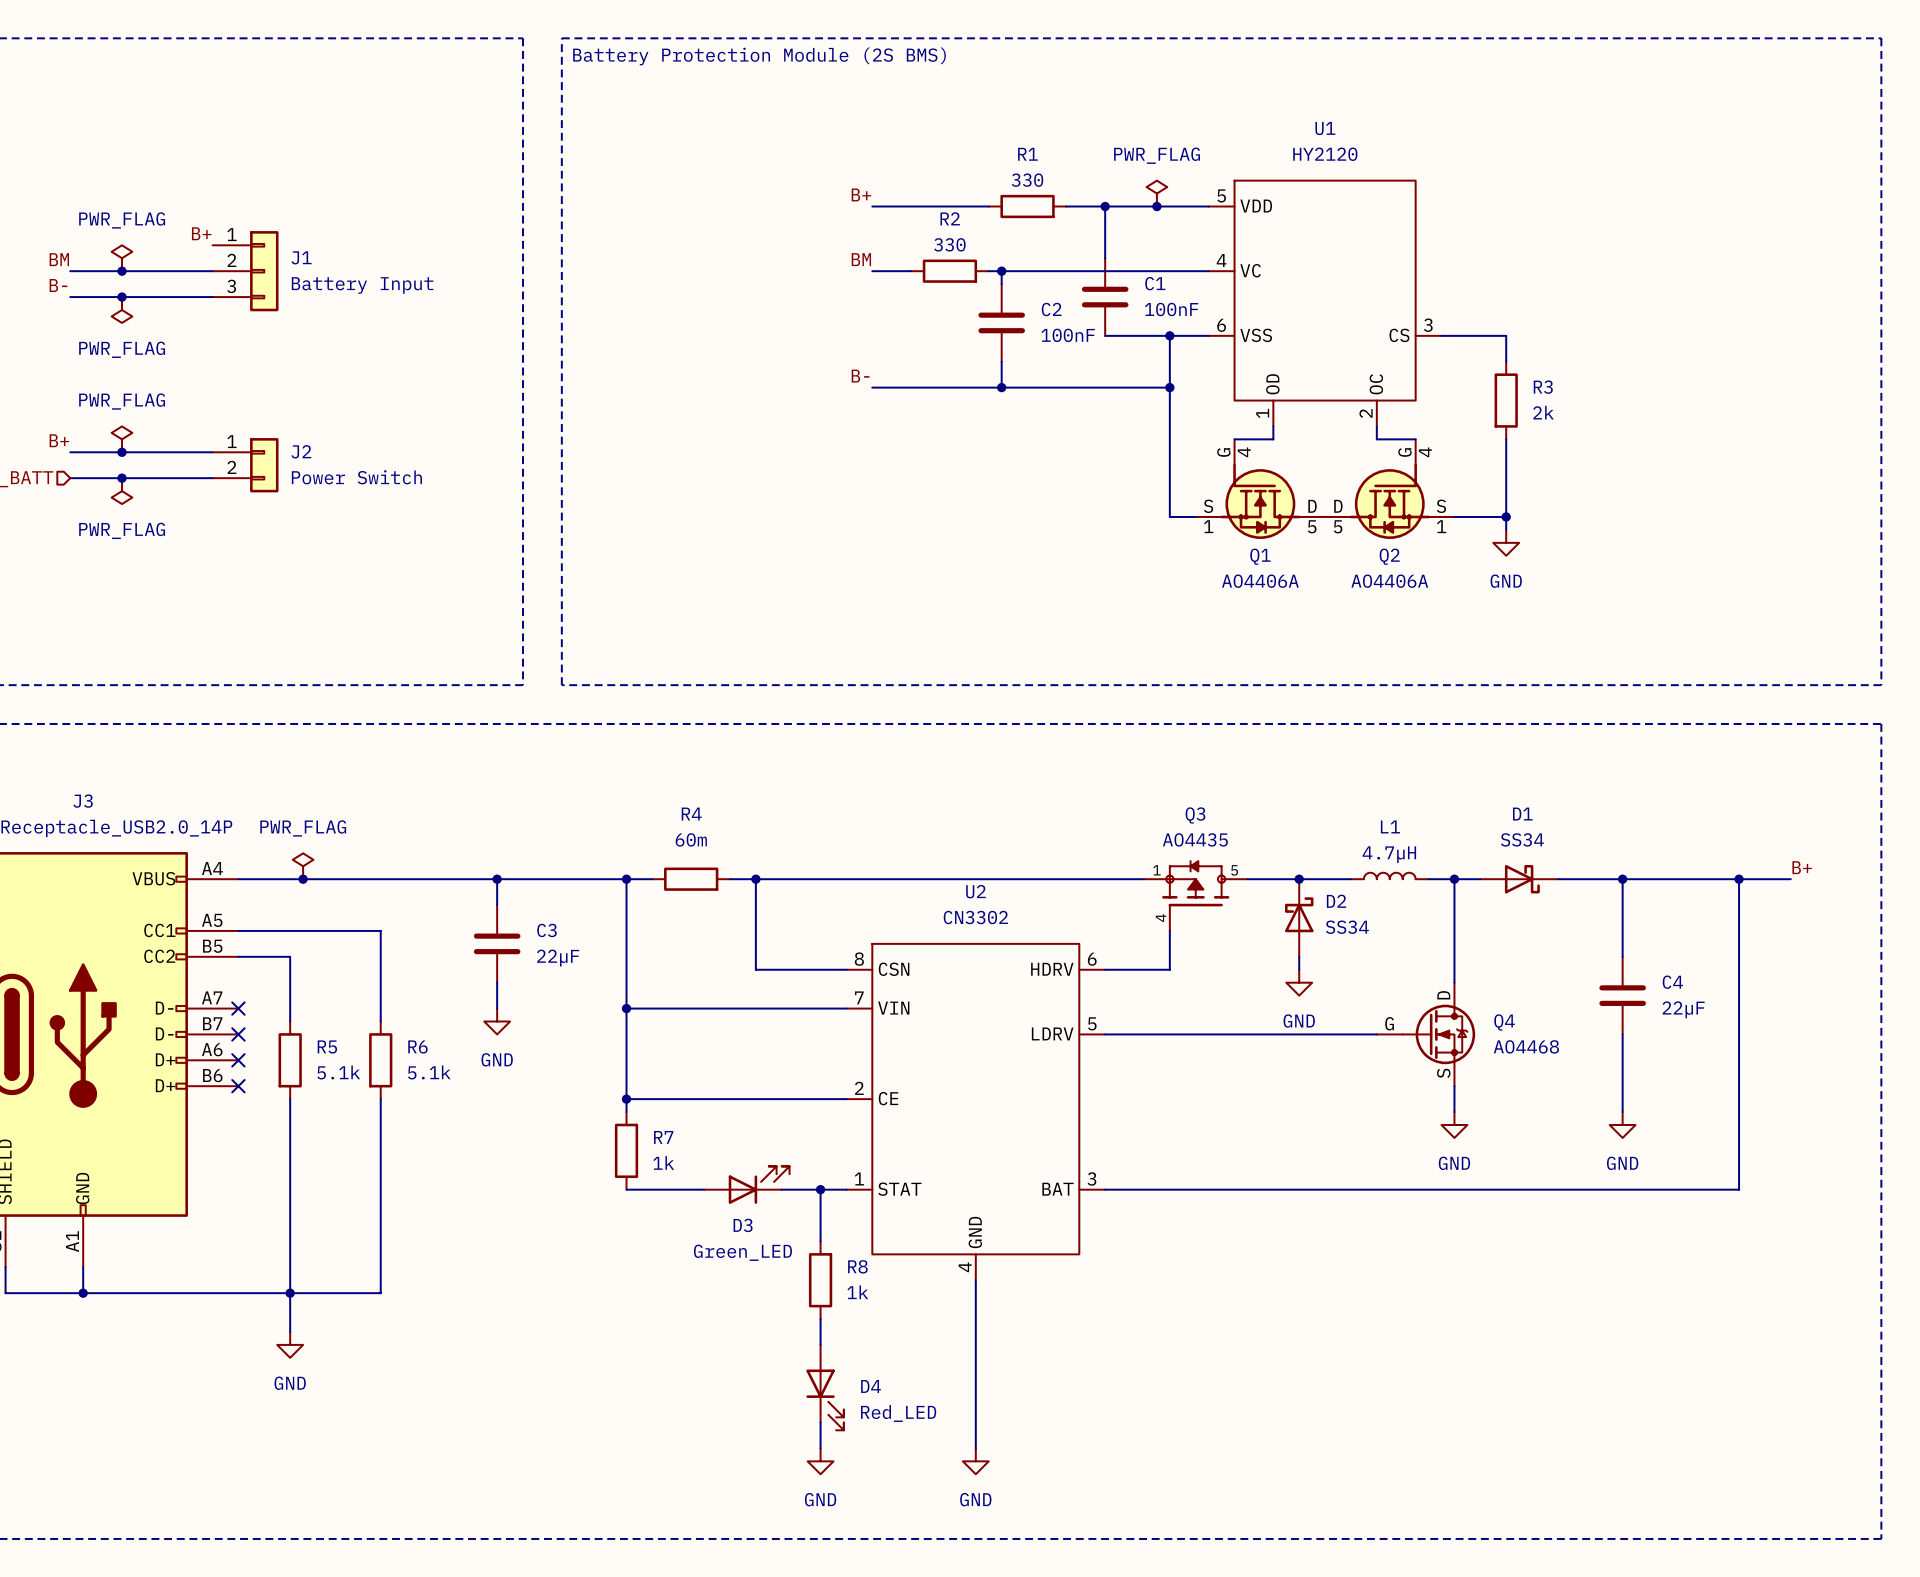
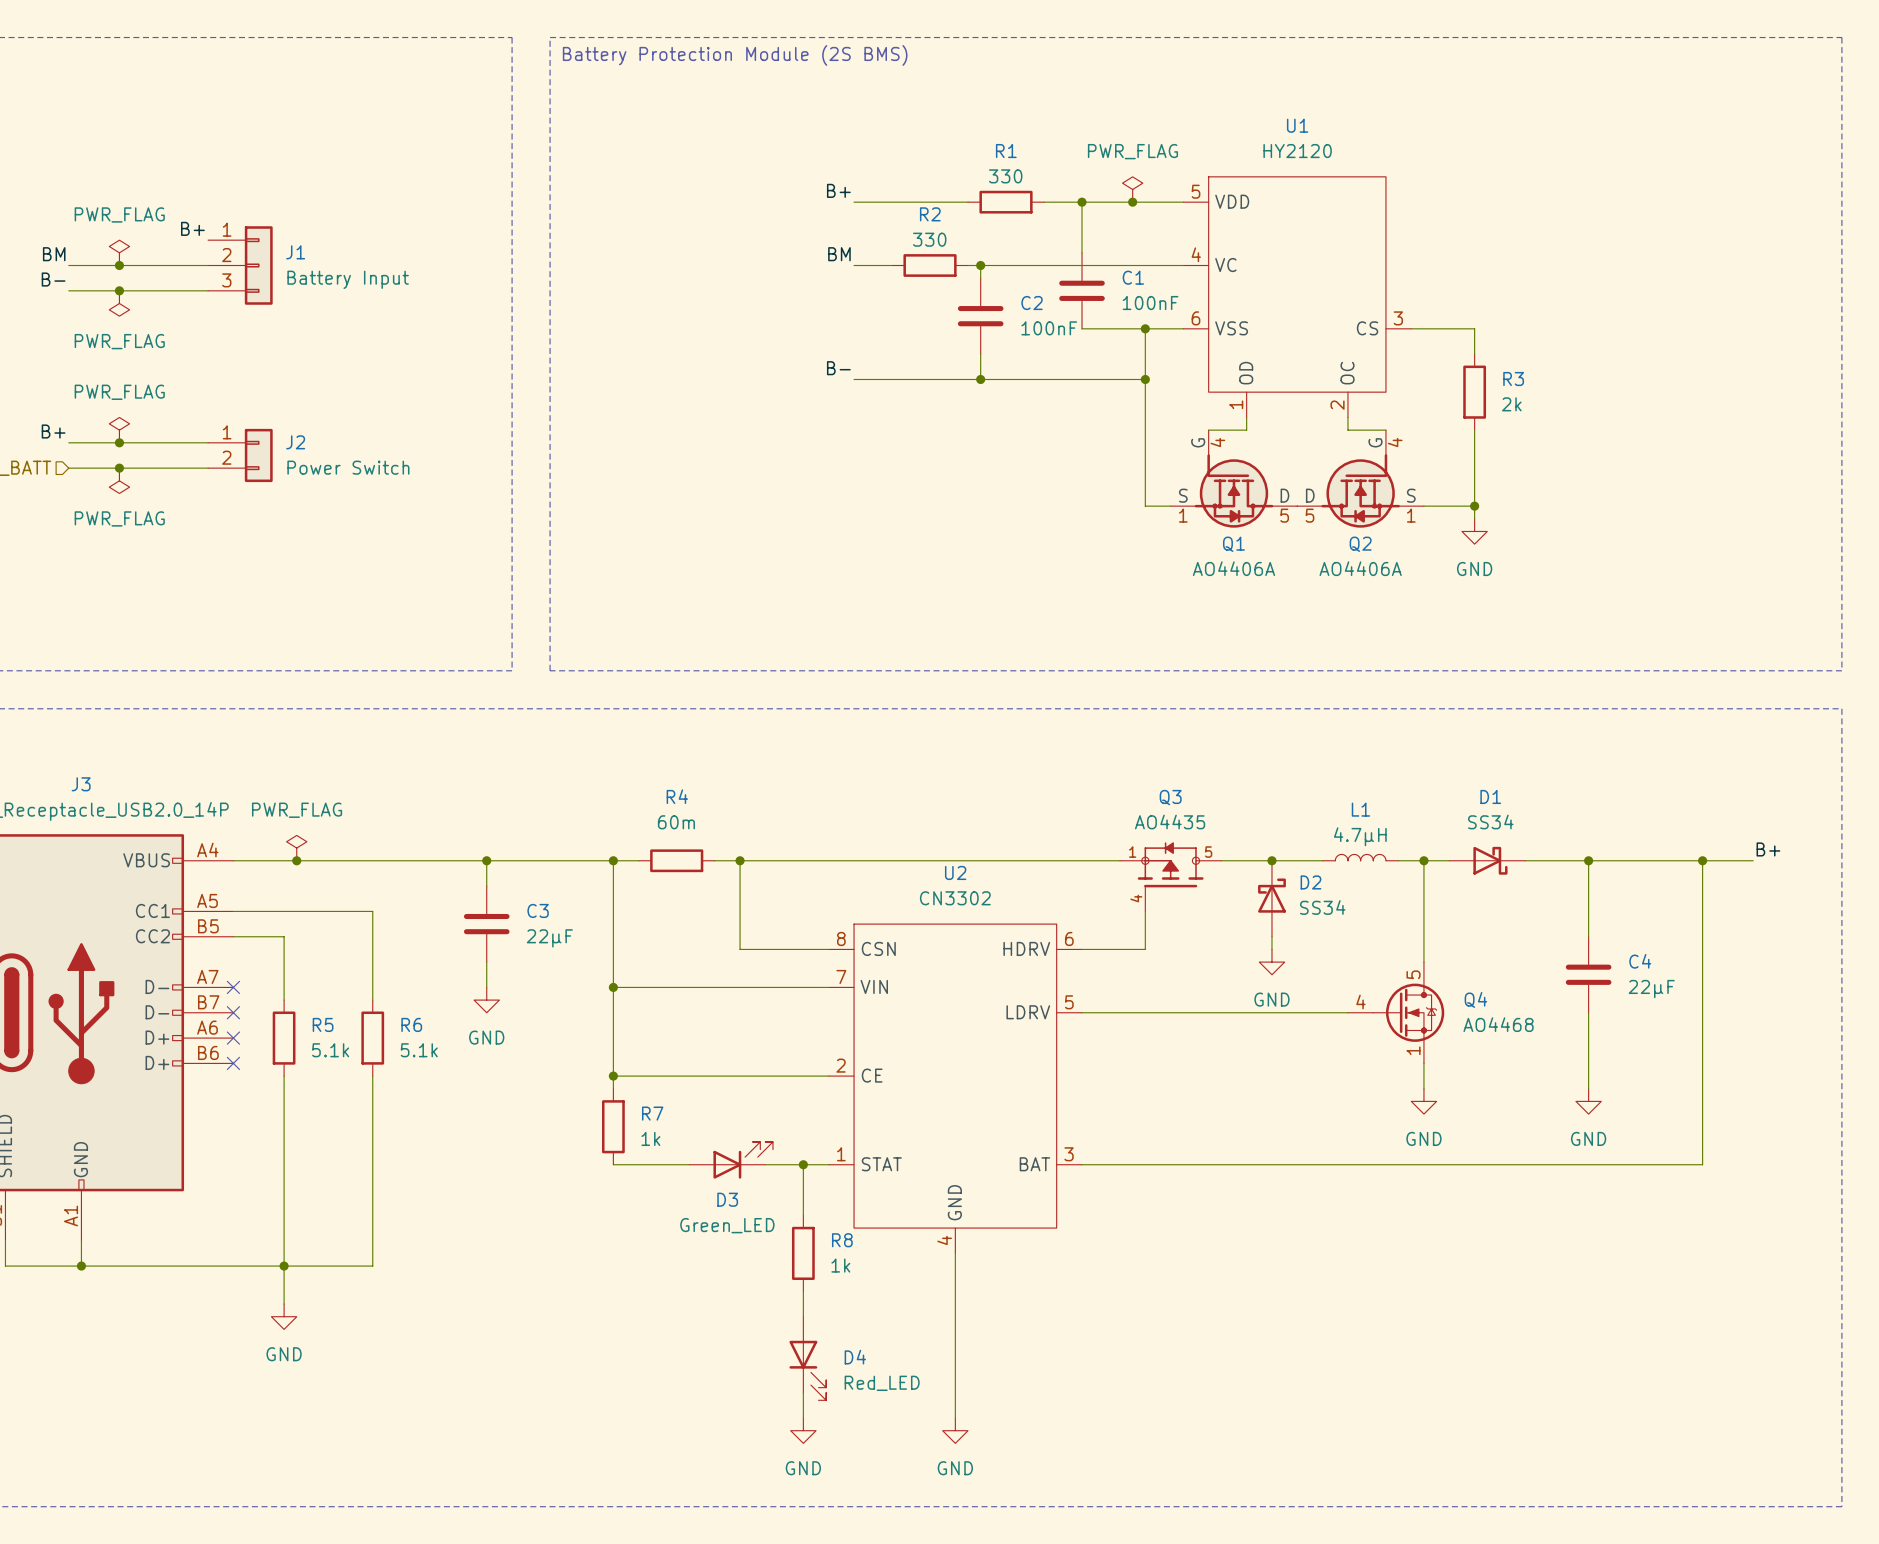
Q4 pin name: D (1443, 995) -> none
Q4 pin number: none -> 5 (1413, 974)
Q4 pin name: G (1389, 1023) -> none
Q4 pin number: none -> 4 (1360, 1002)
Q4 pin name: S (1443, 1073) -> none
Q4 pin number: none -> 1 (1413, 1050)

